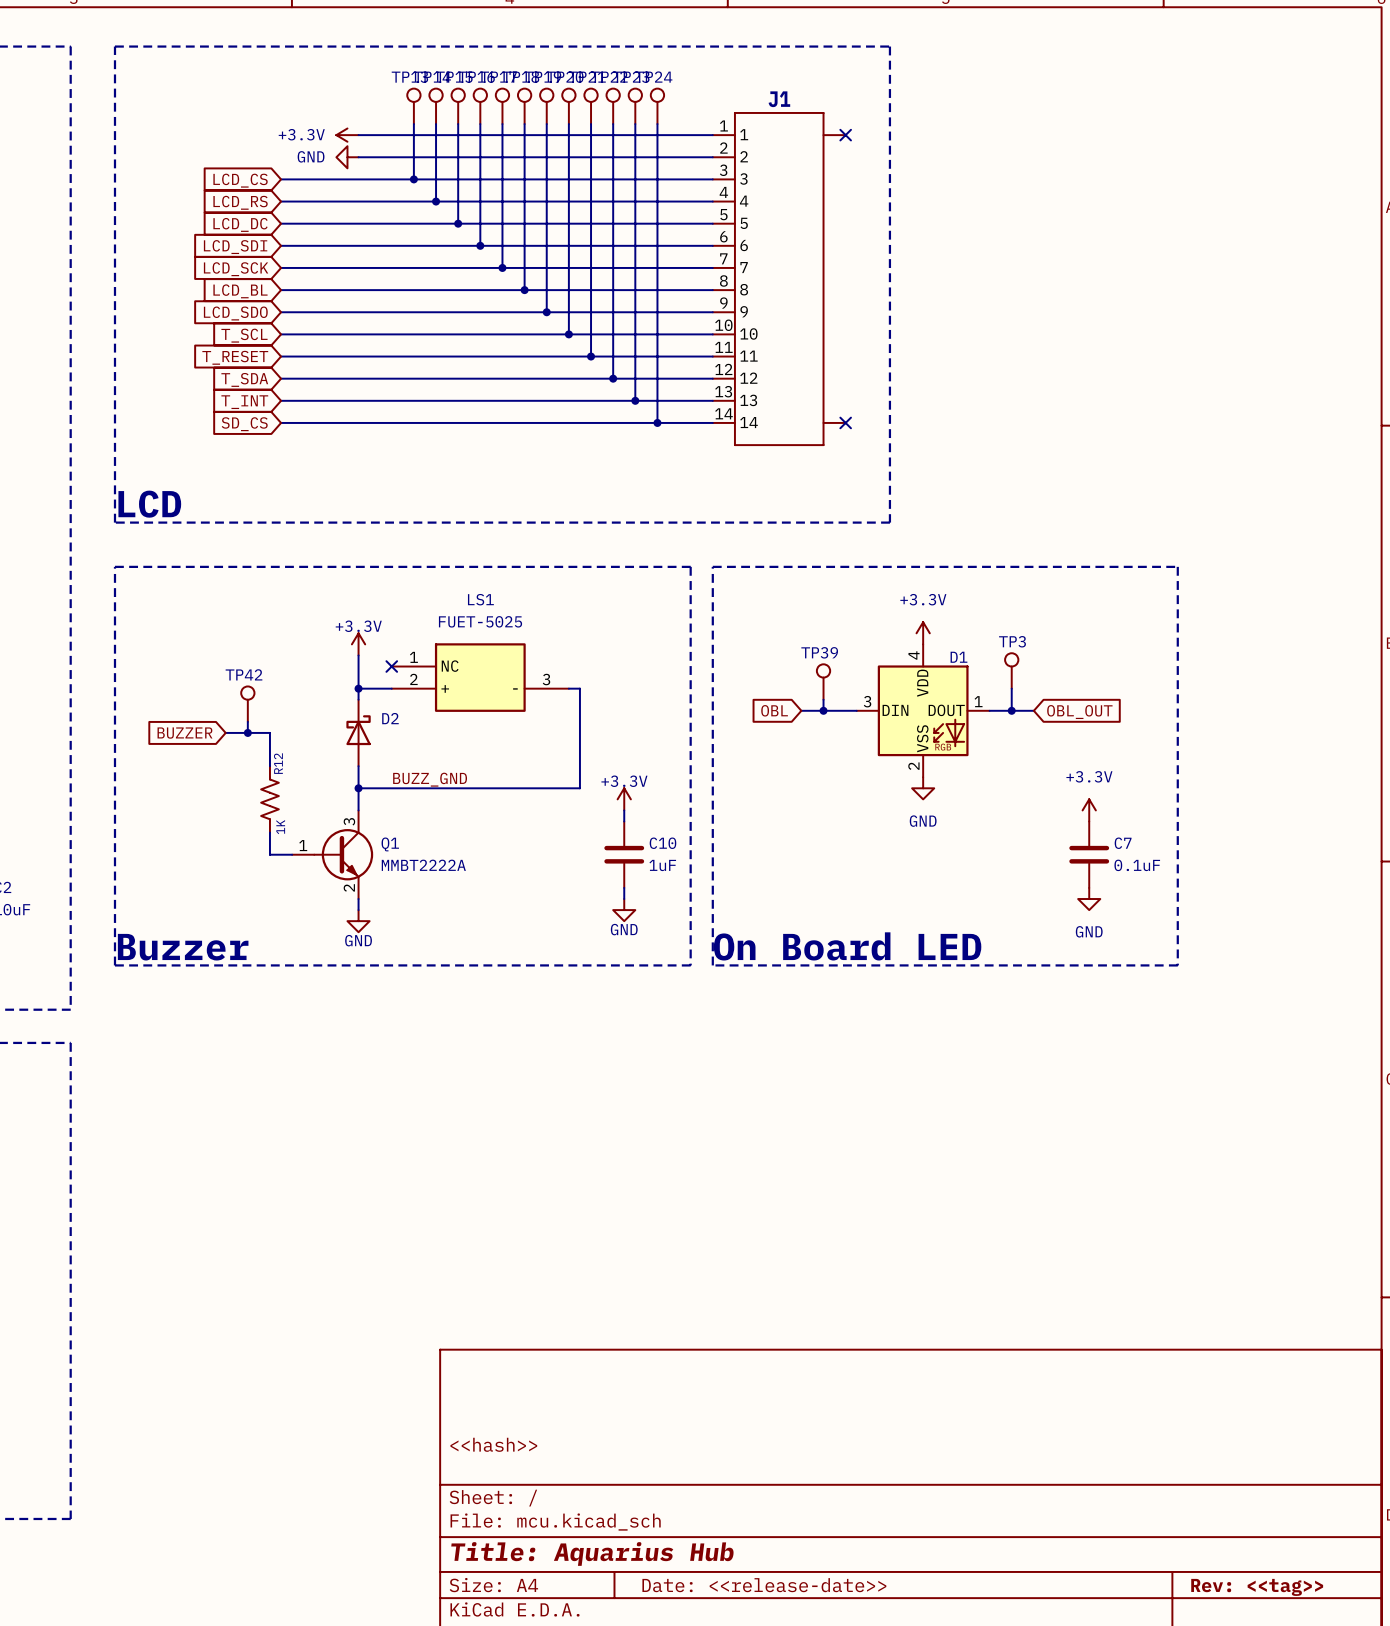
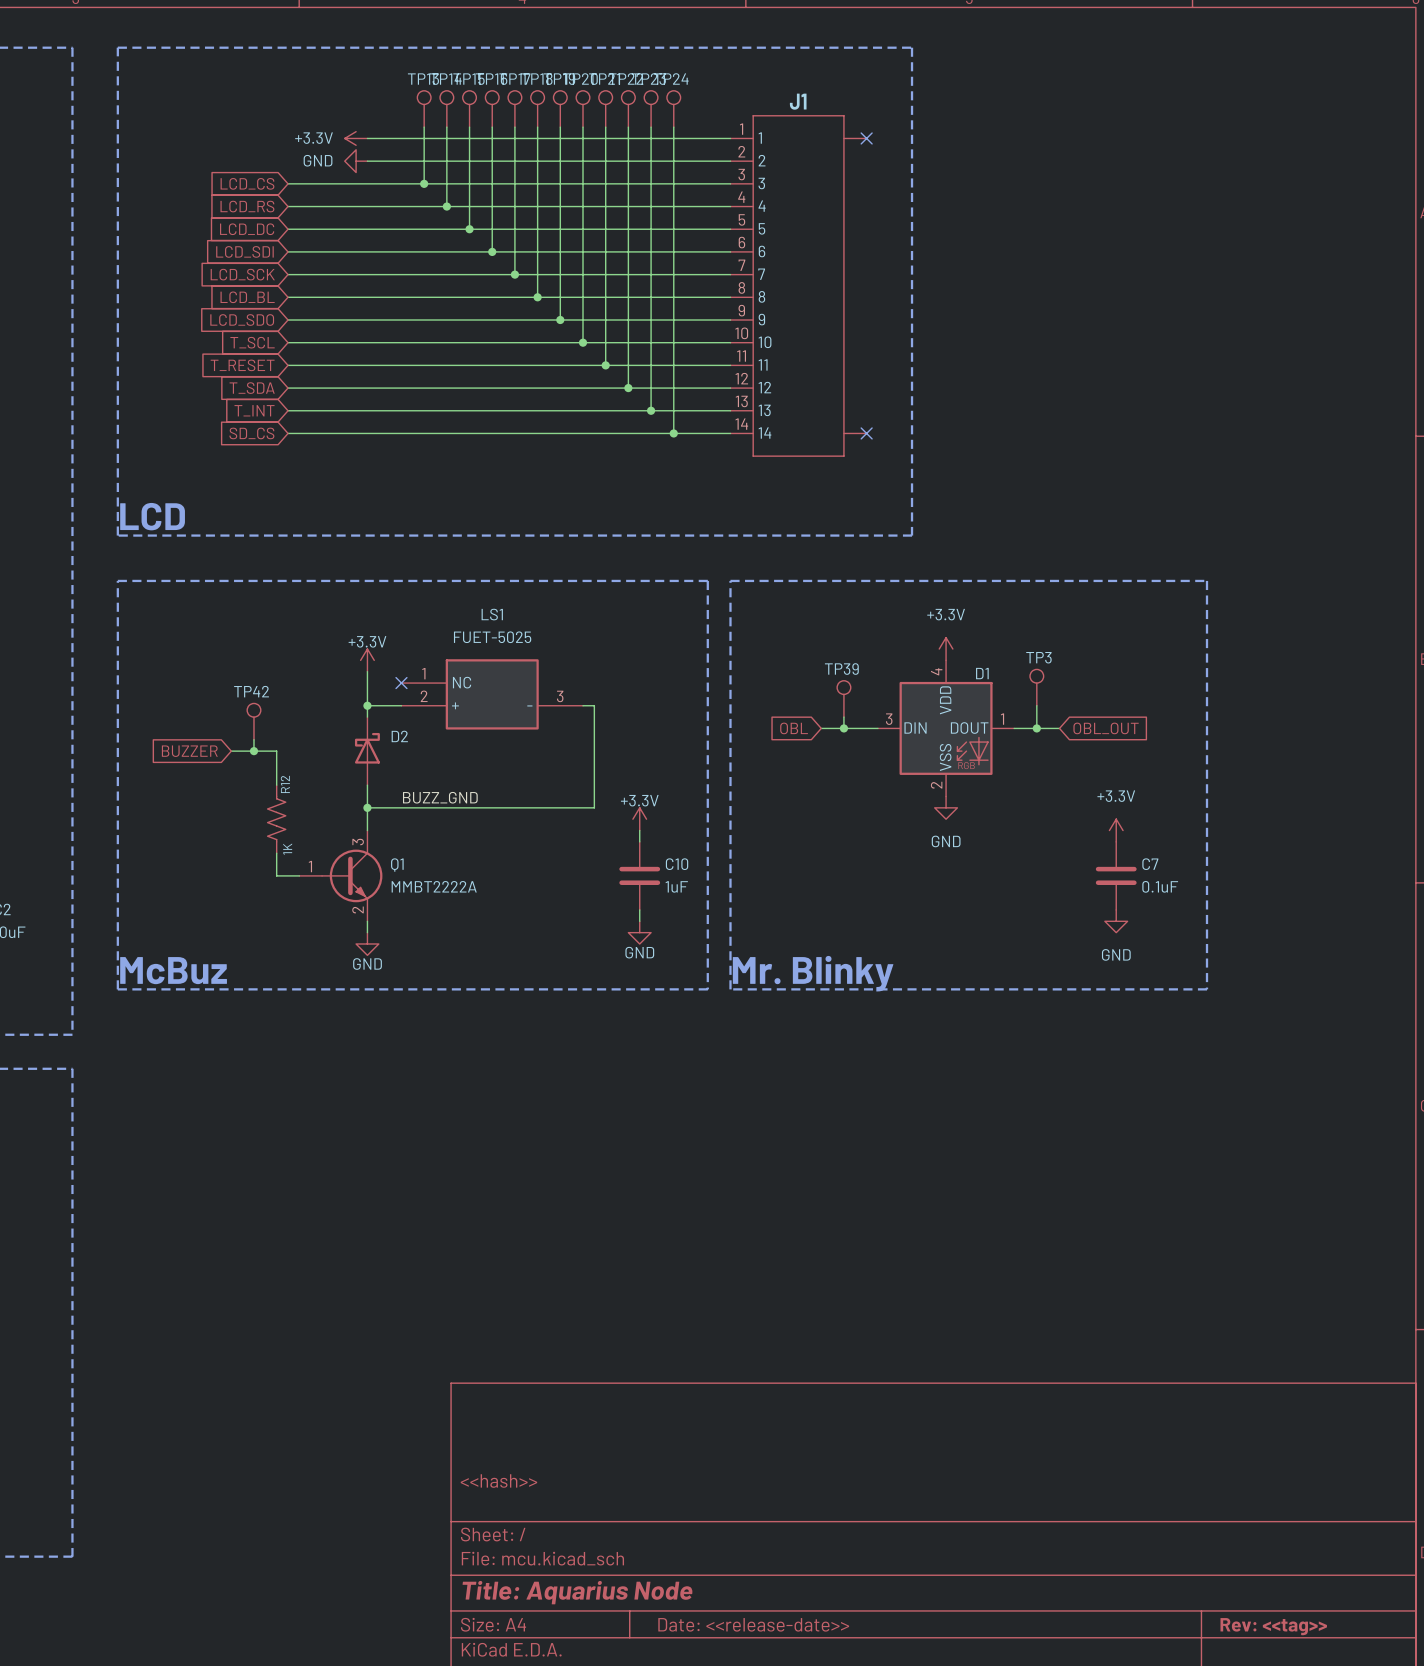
text: On Board LED (847, 946) -> Mr. Blinky (813, 973)
text: Buzzer (183, 947) -> McBuz (173, 970)
title block: Title: Aquarius Hub (592, 1553) -> Title: Aquarius Node (577, 1592)

